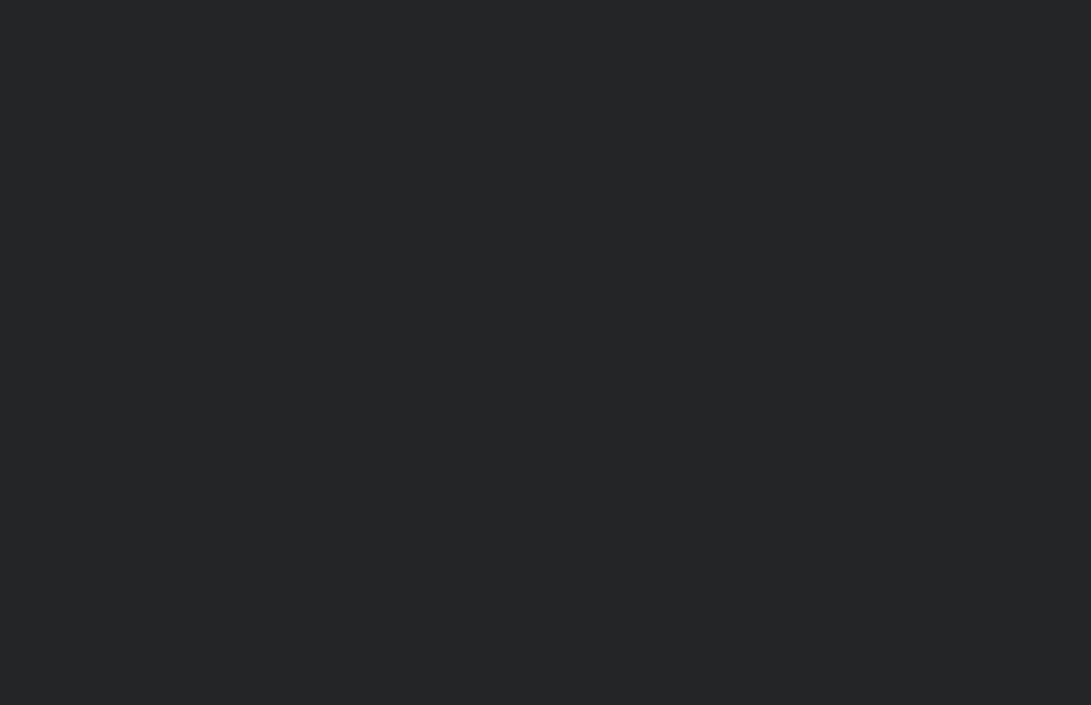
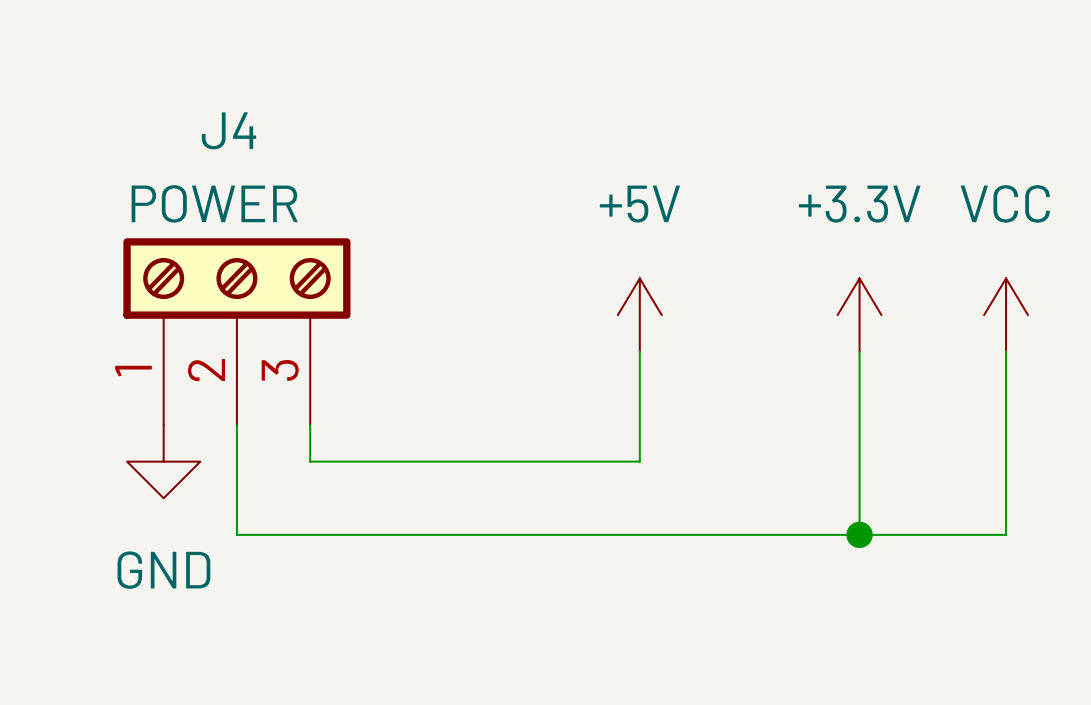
power symbol: none -> +5V (639, 315)
power symbol: none -> +3.3V (859, 315)
power symbol: none -> VCC (1006, 315)
J4: none -> POWER (236, 331)
wire: none -> (639, 351) (639, 461) (310, 461) (310, 425)
wire: none -> (859, 351) (859, 534)
wire: none -> (1006, 351) (1006, 534) (236, 534) (236, 425)
power symbol: none -> GND (163, 461)
junction: none -> (859, 534)

